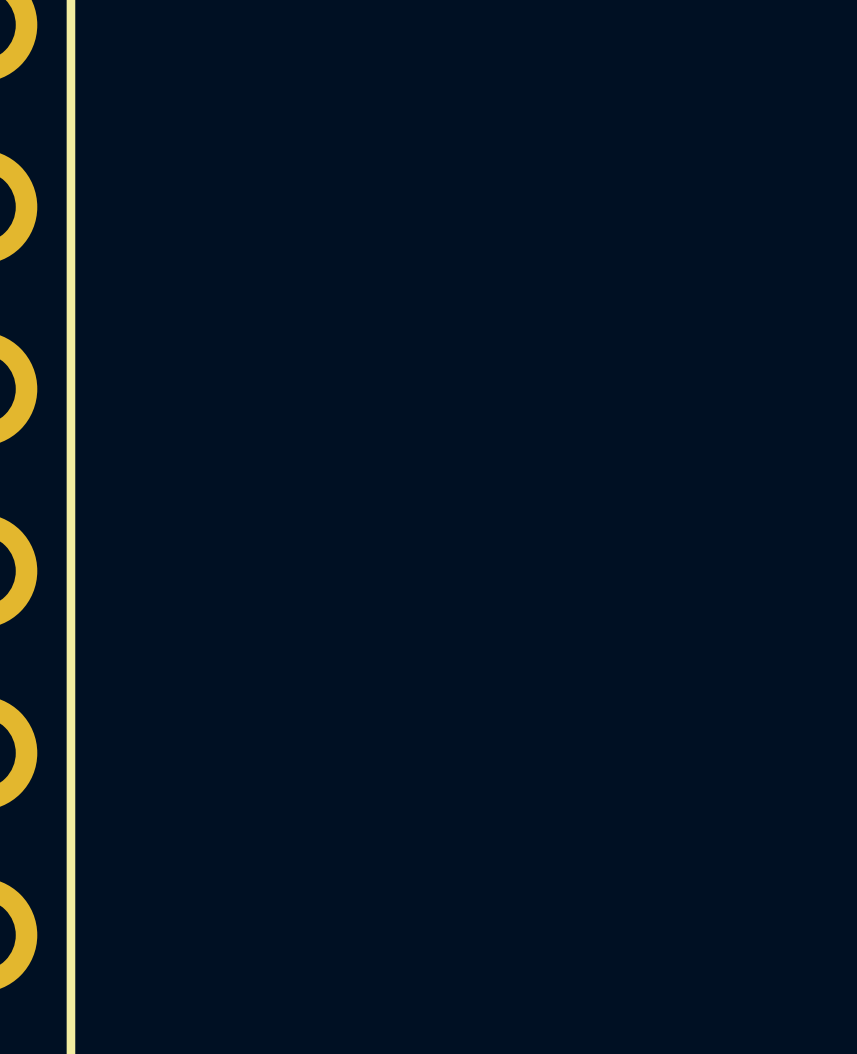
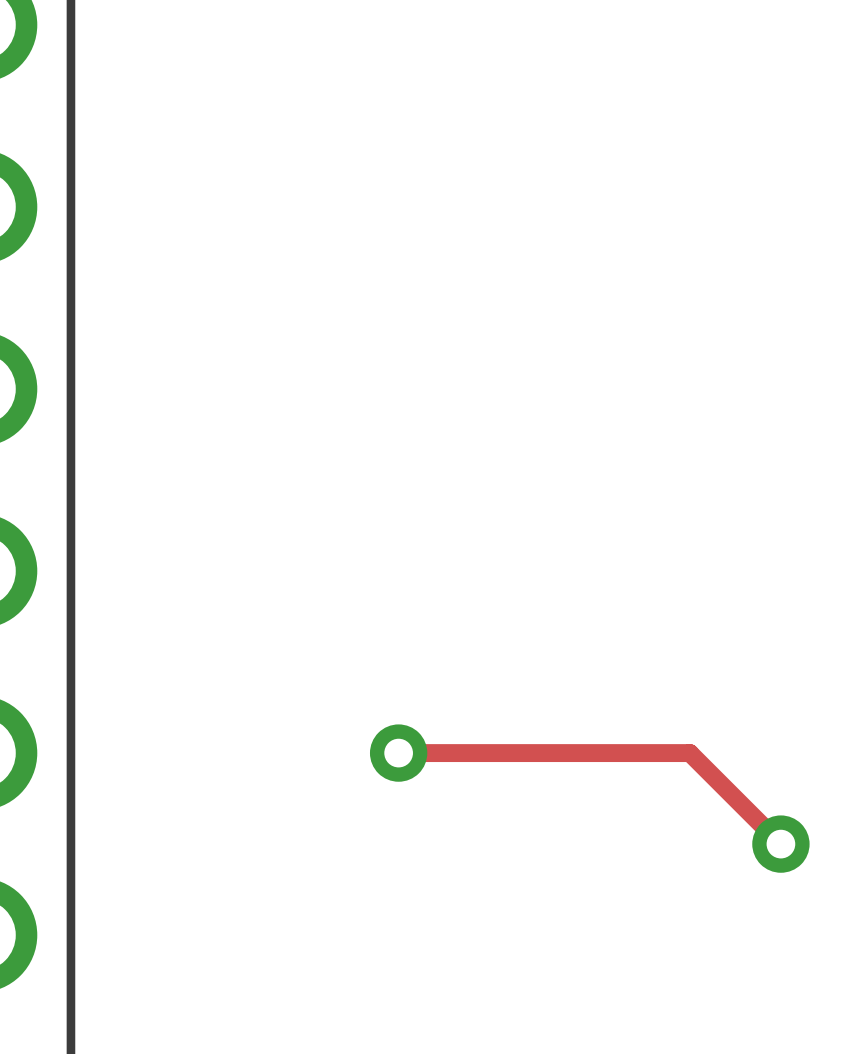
track: none -> (398, 753) (689, 753) (780, 844)
via: none -> (398, 753)
via: none -> (780, 844)

